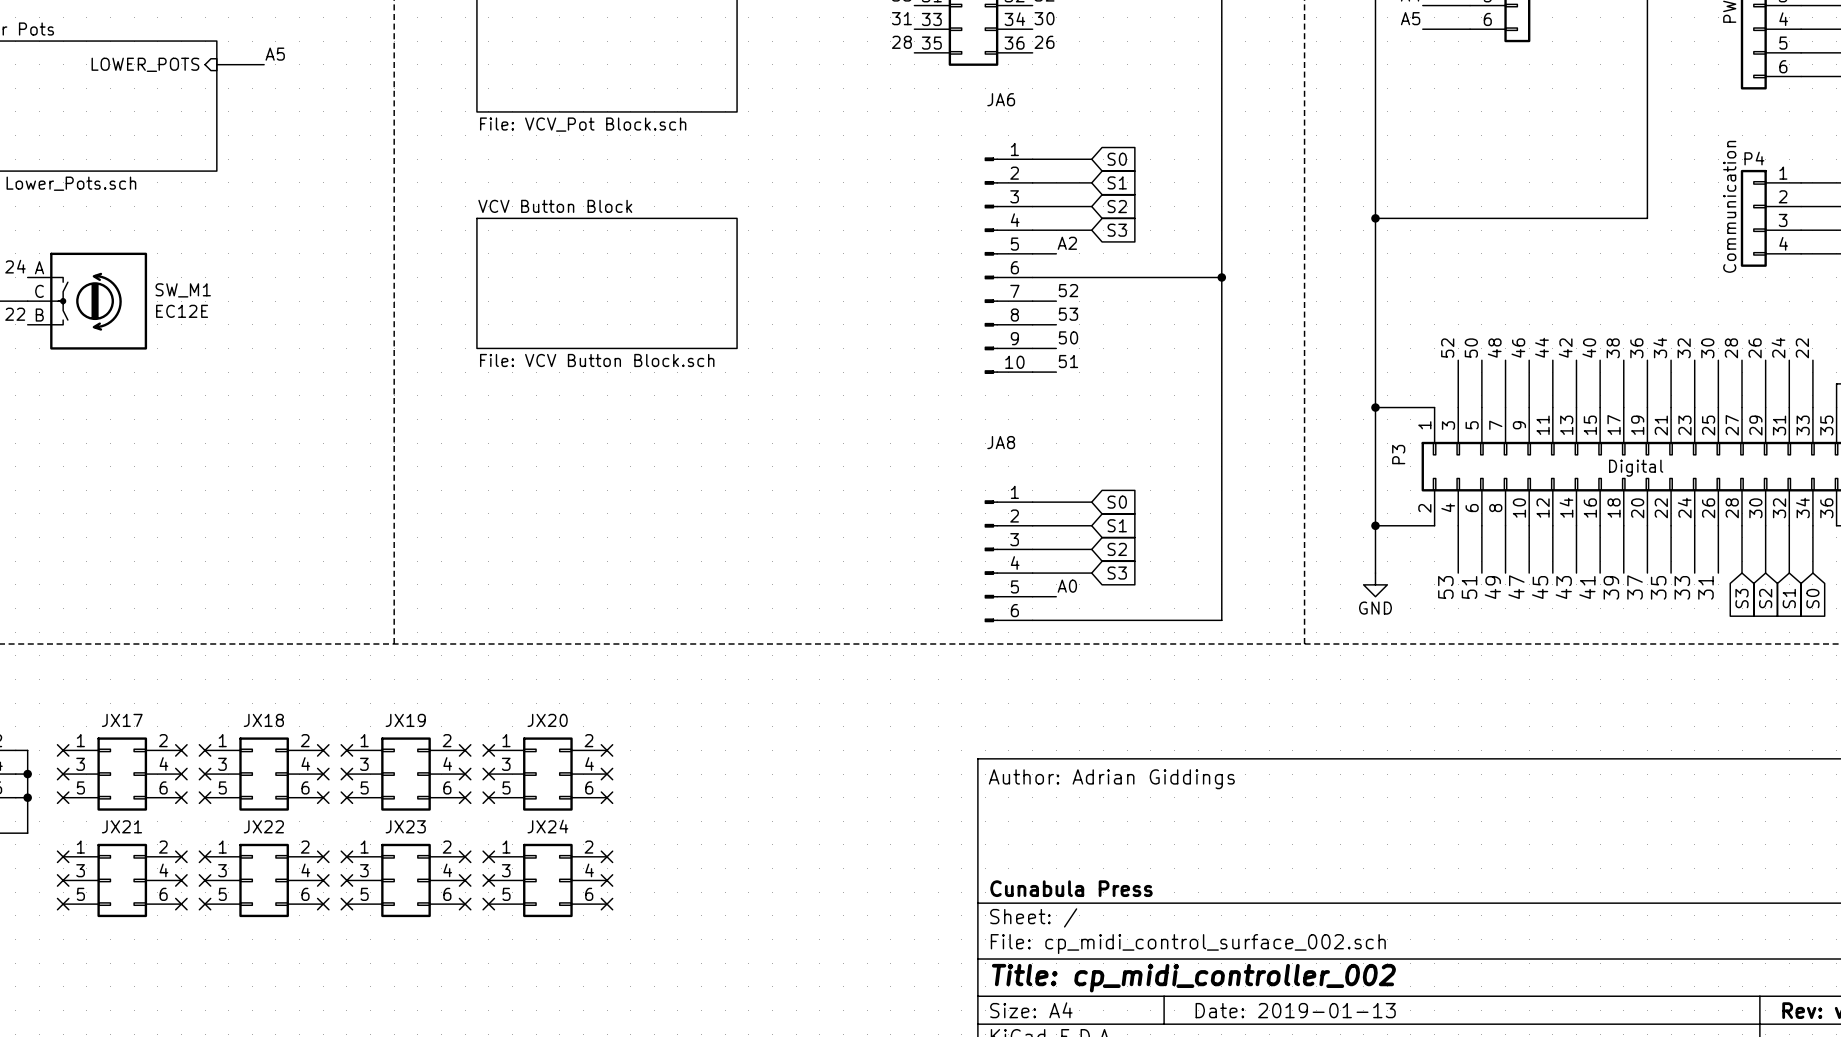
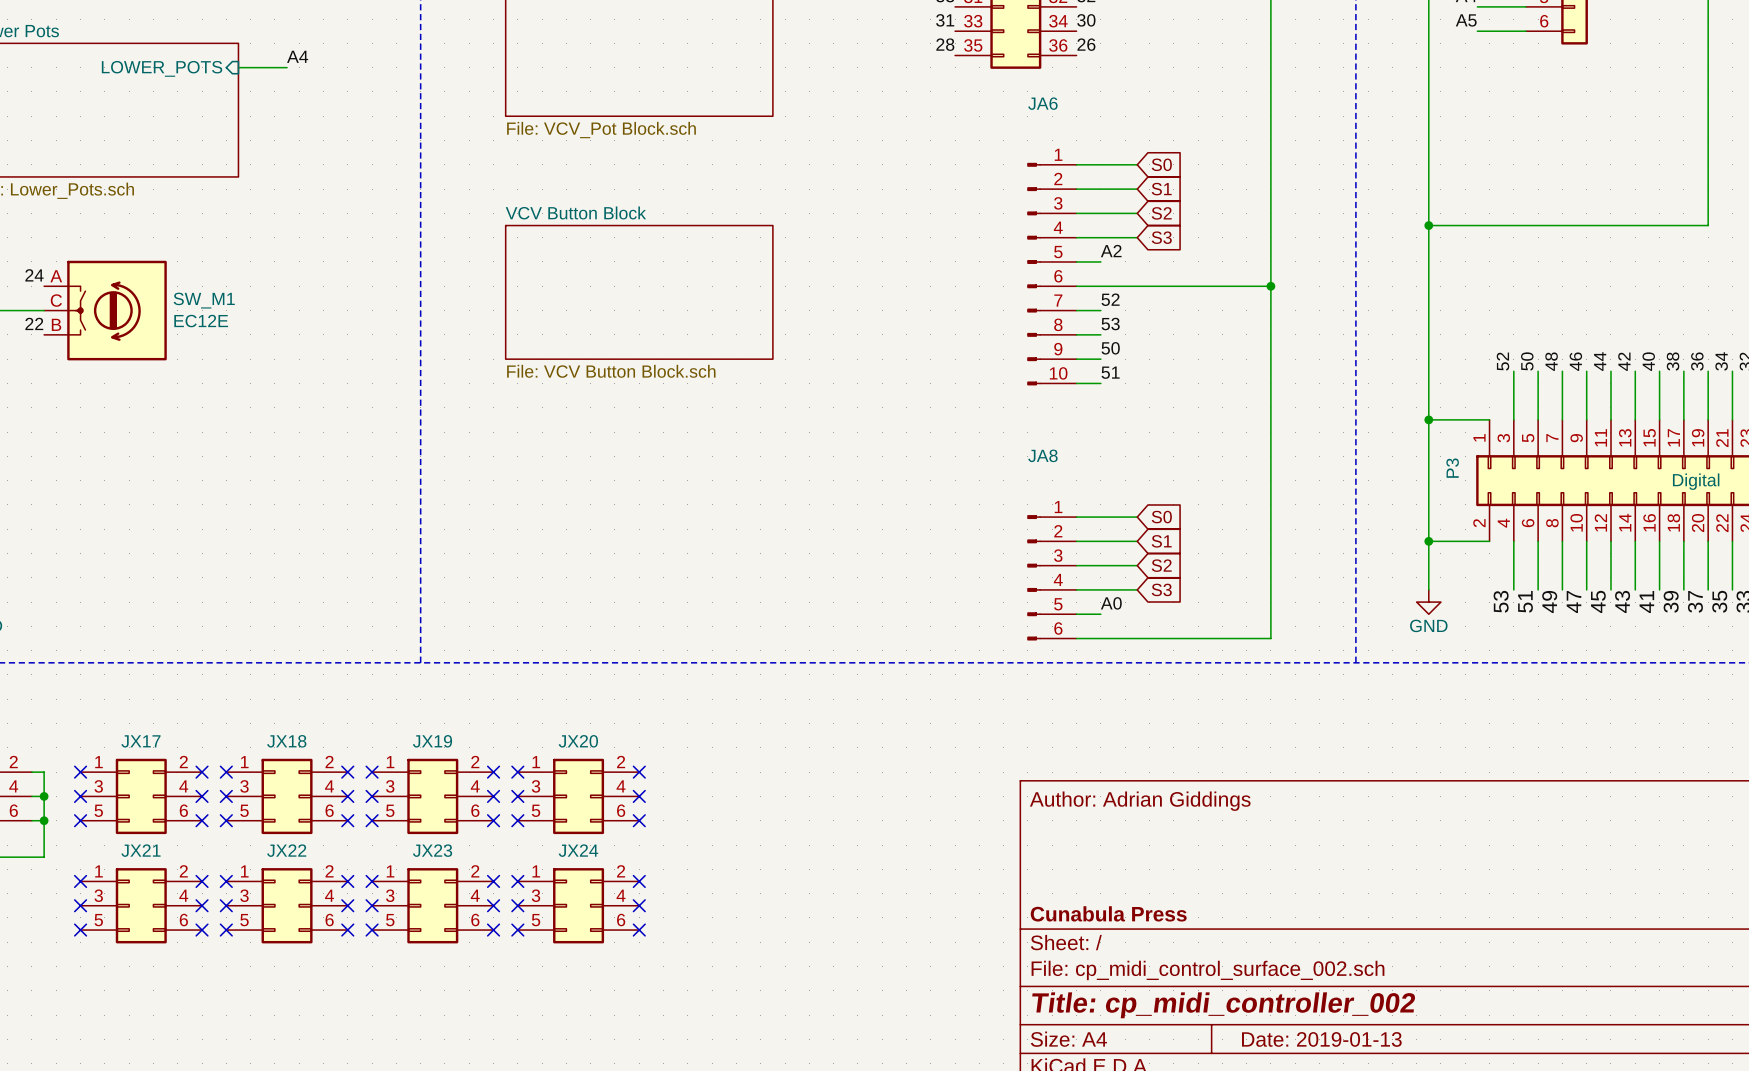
label: A5 (275, 54) -> A4 (297, 56)

